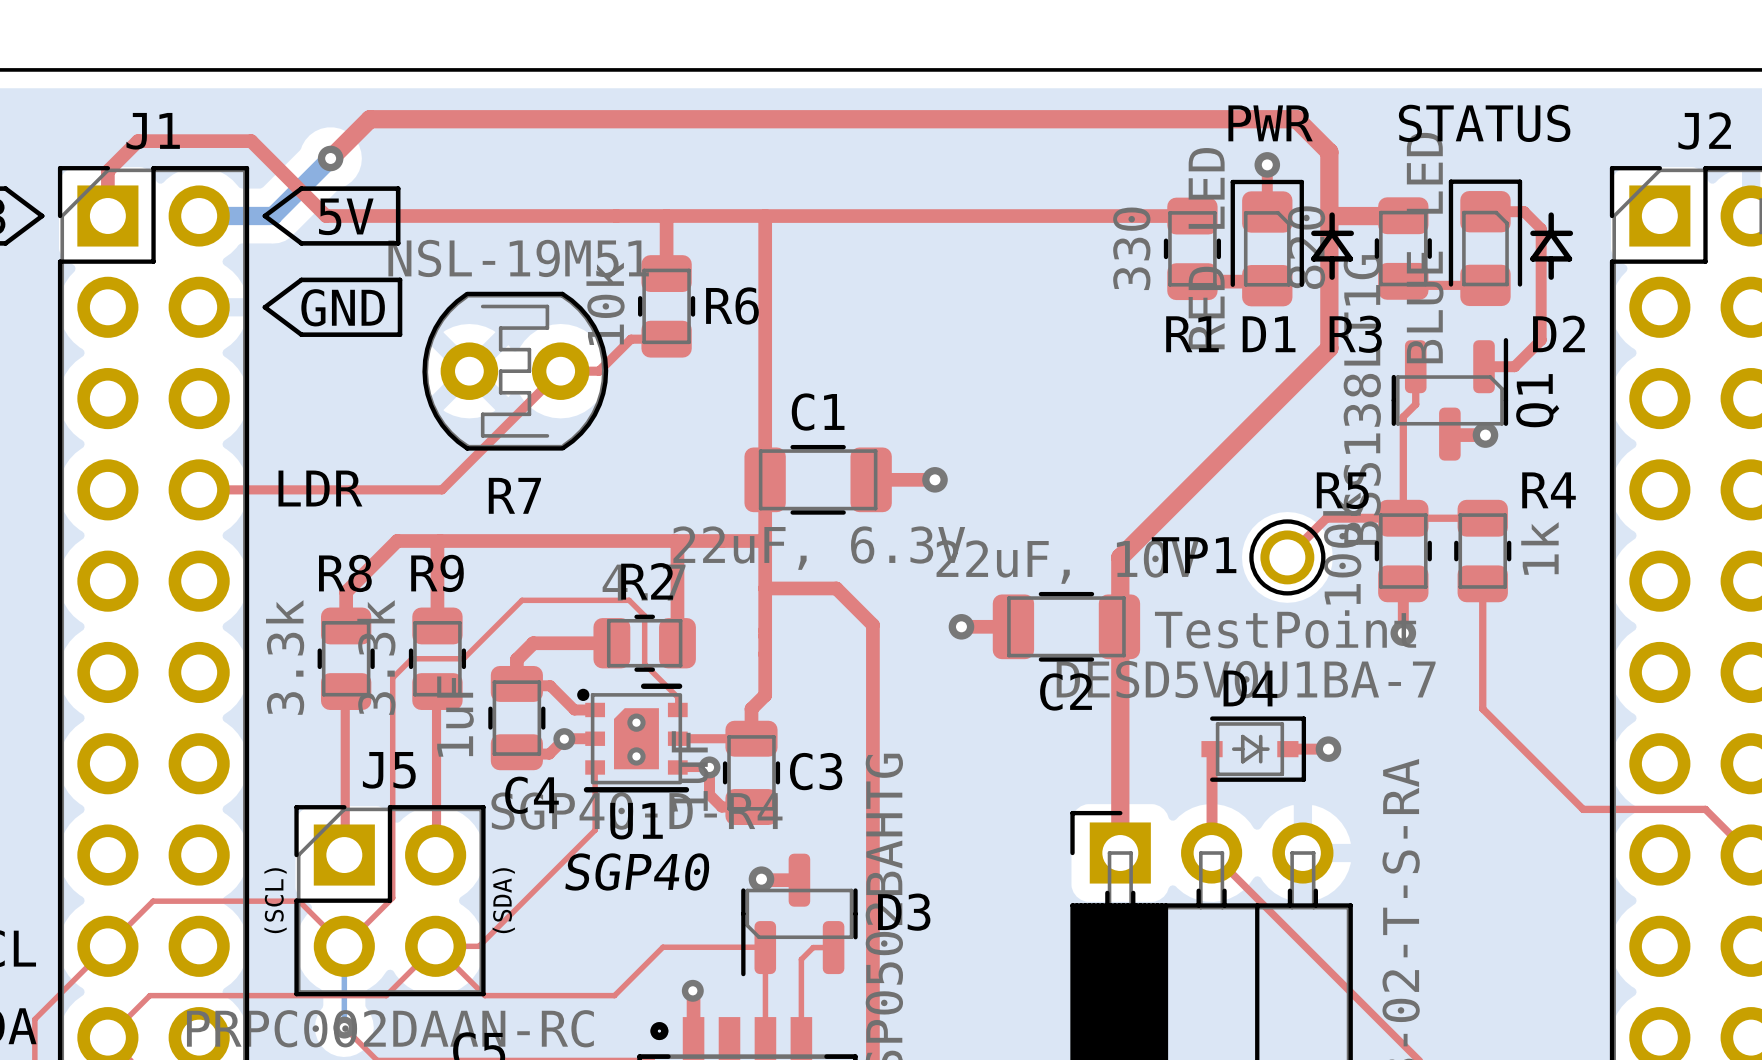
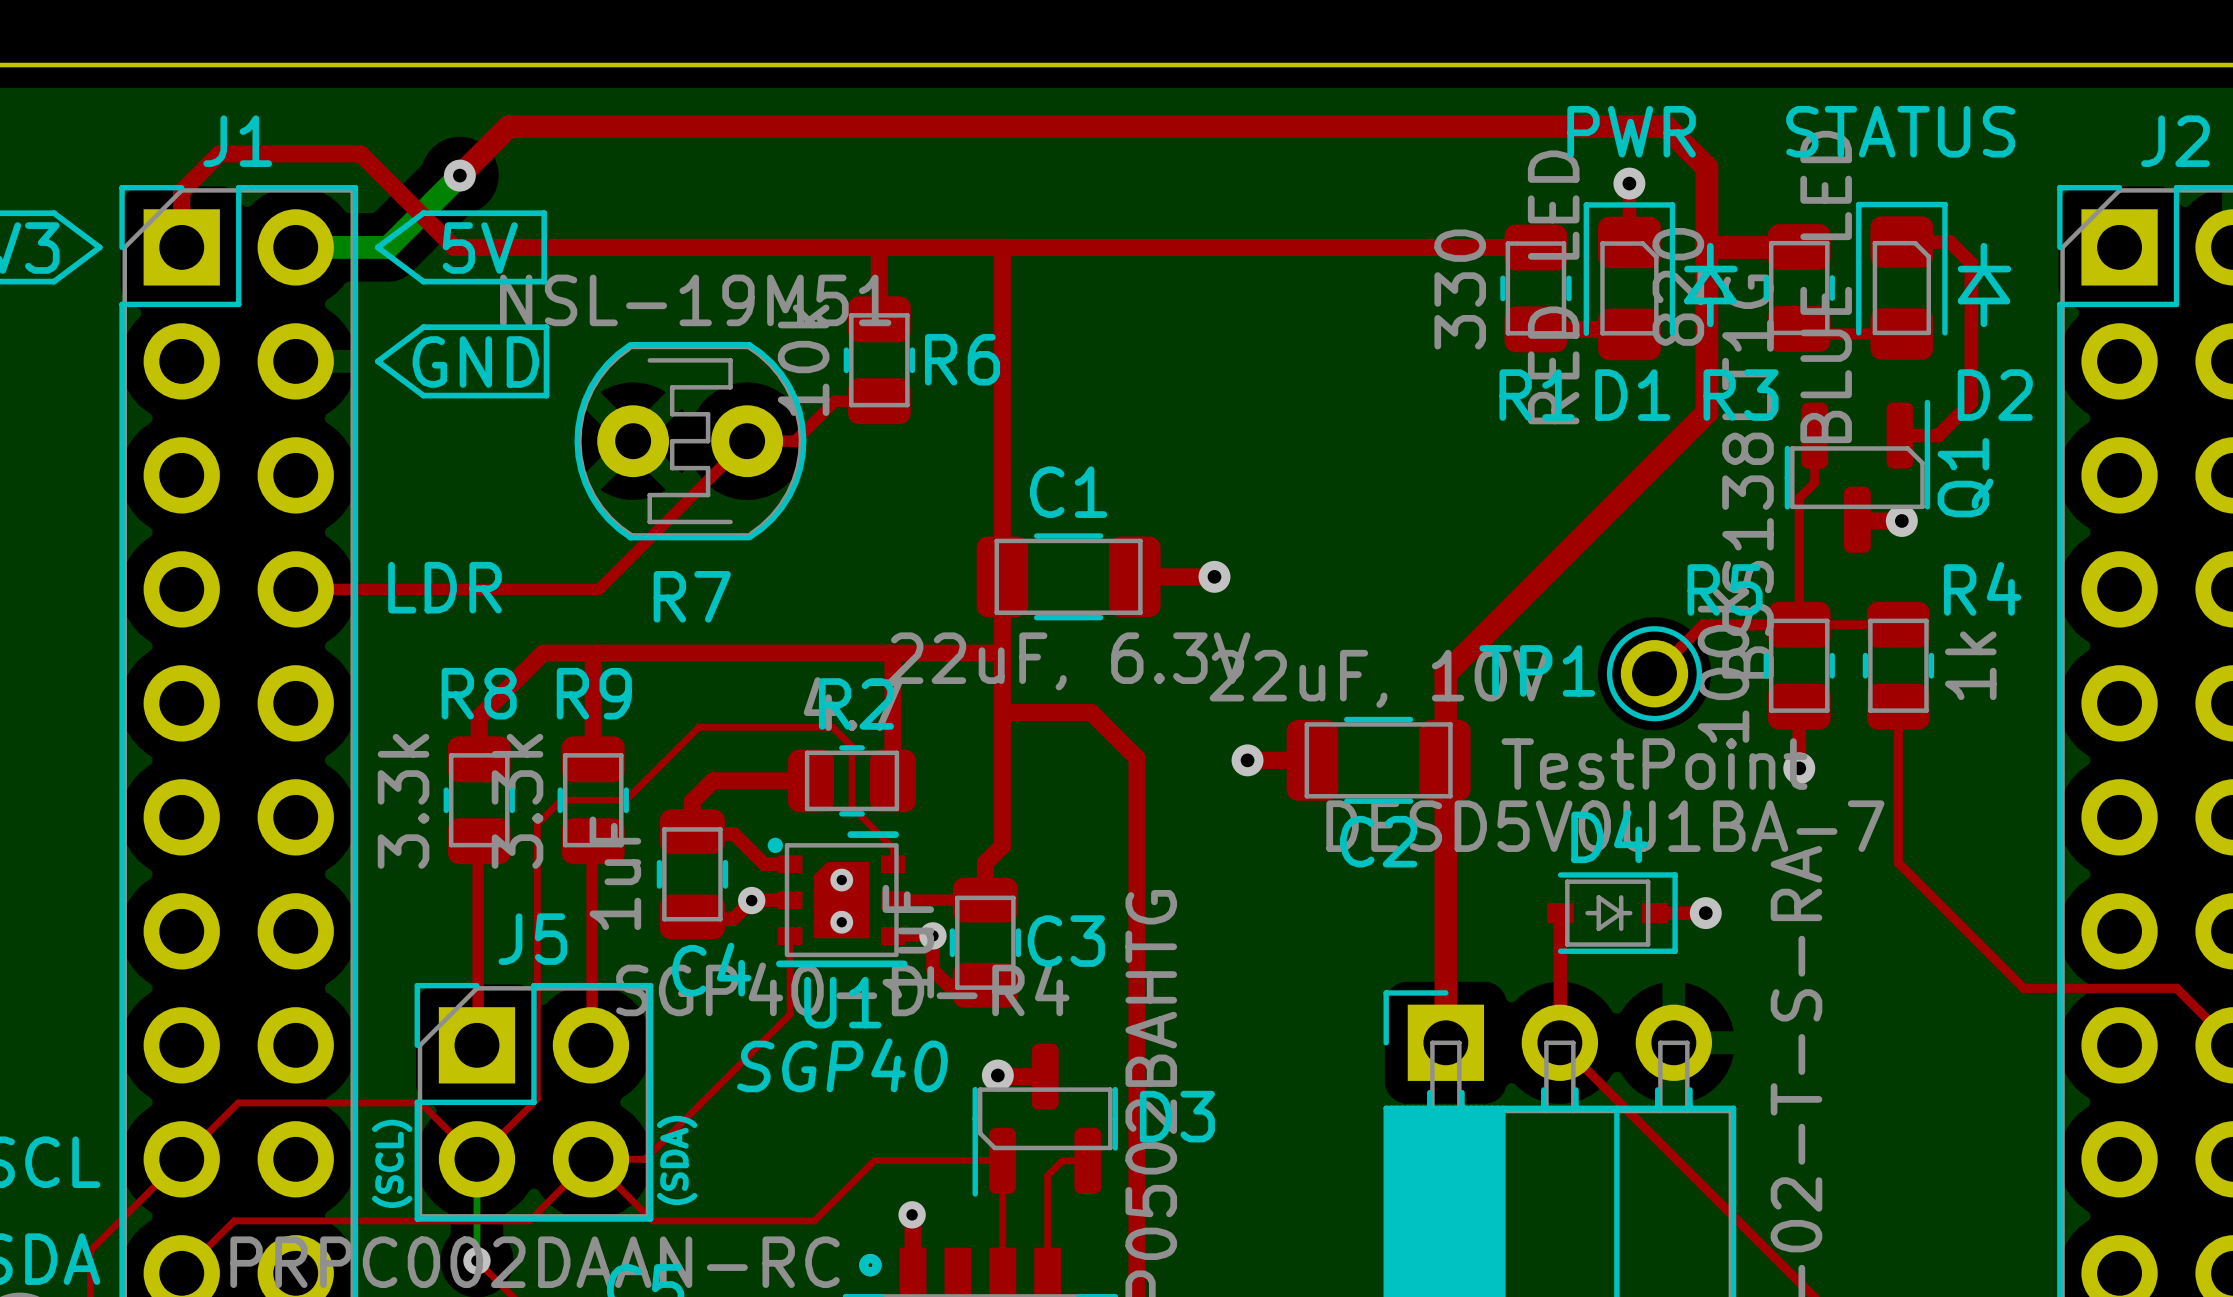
text position: (SCL) (275, 900) -> (SCL) (392, 1163)
text position: (SDA) (503, 900) -> (SDA) (677, 1160)

